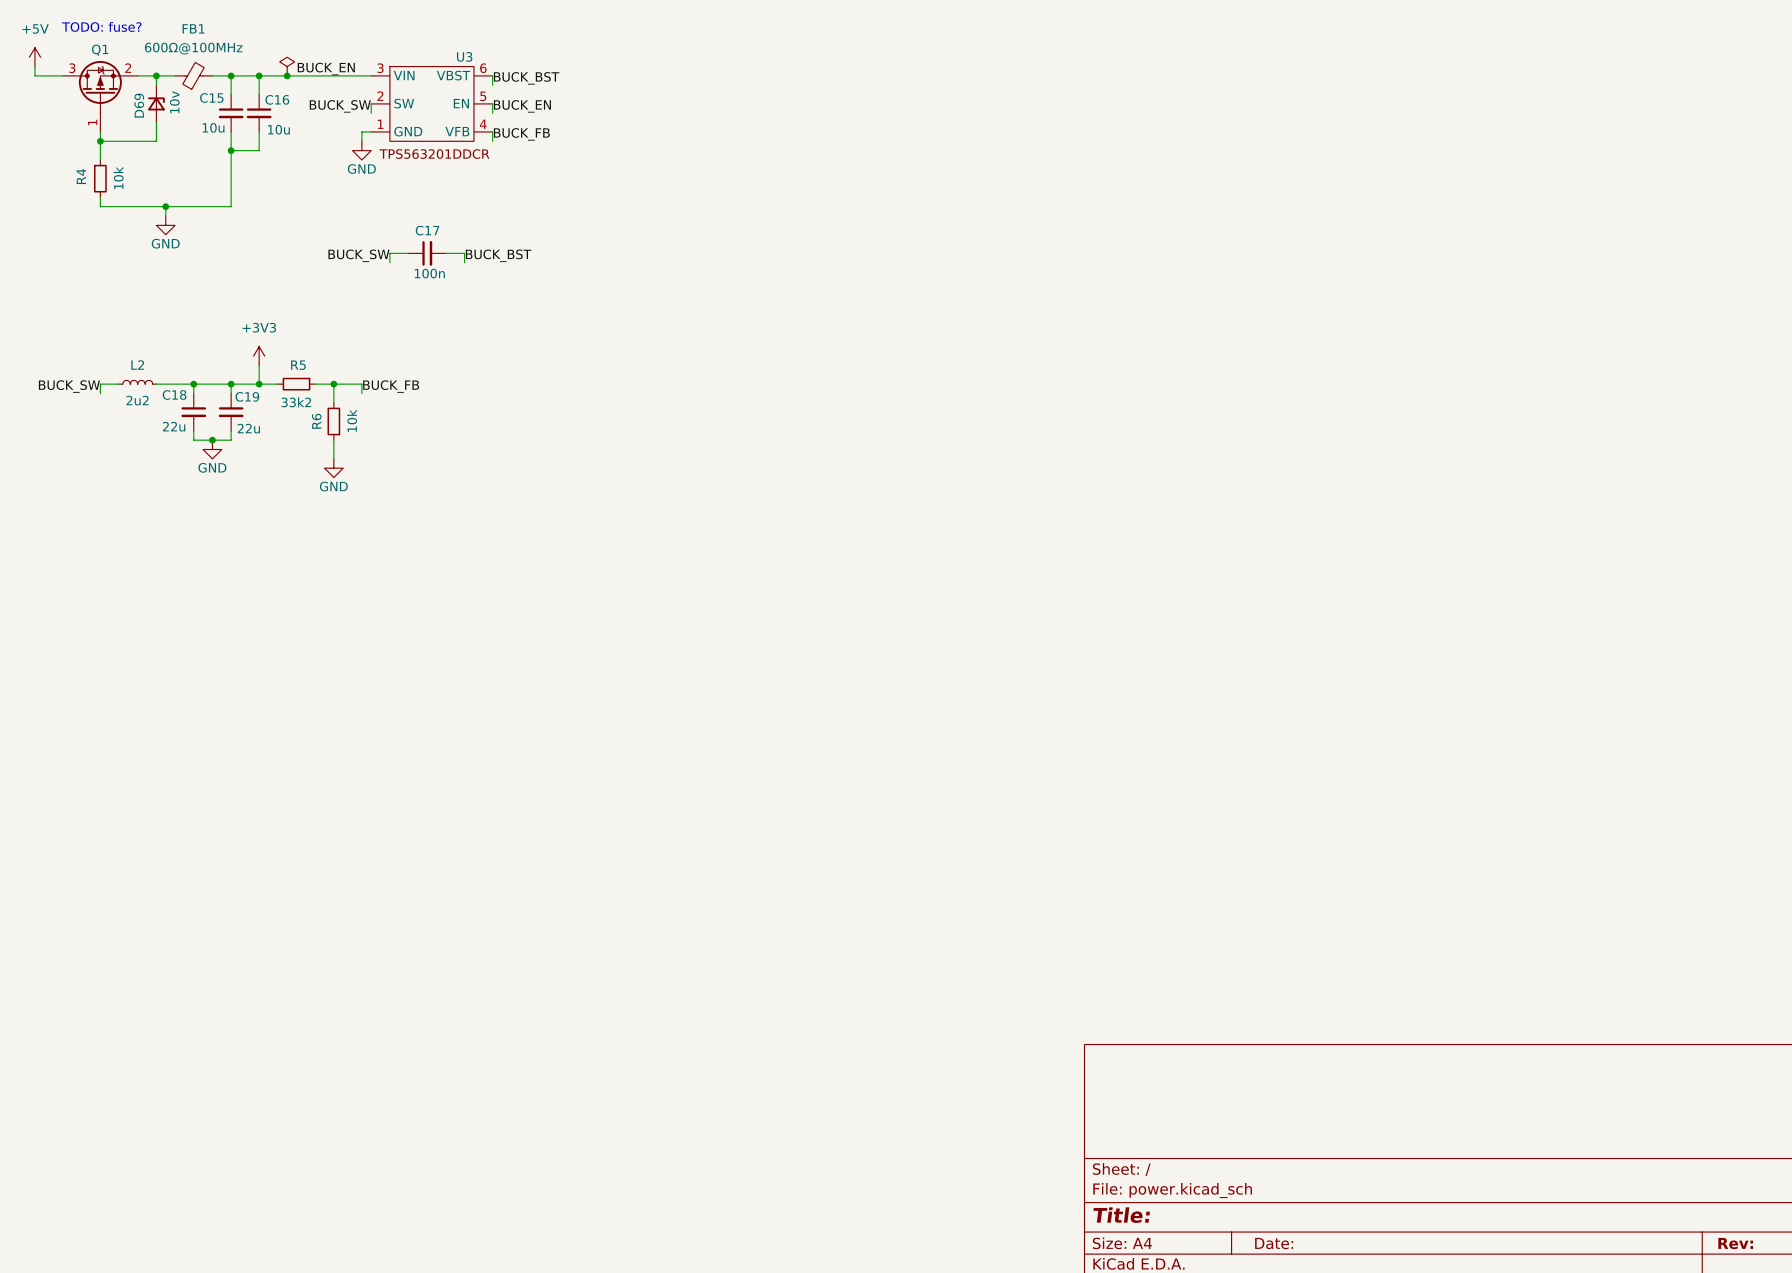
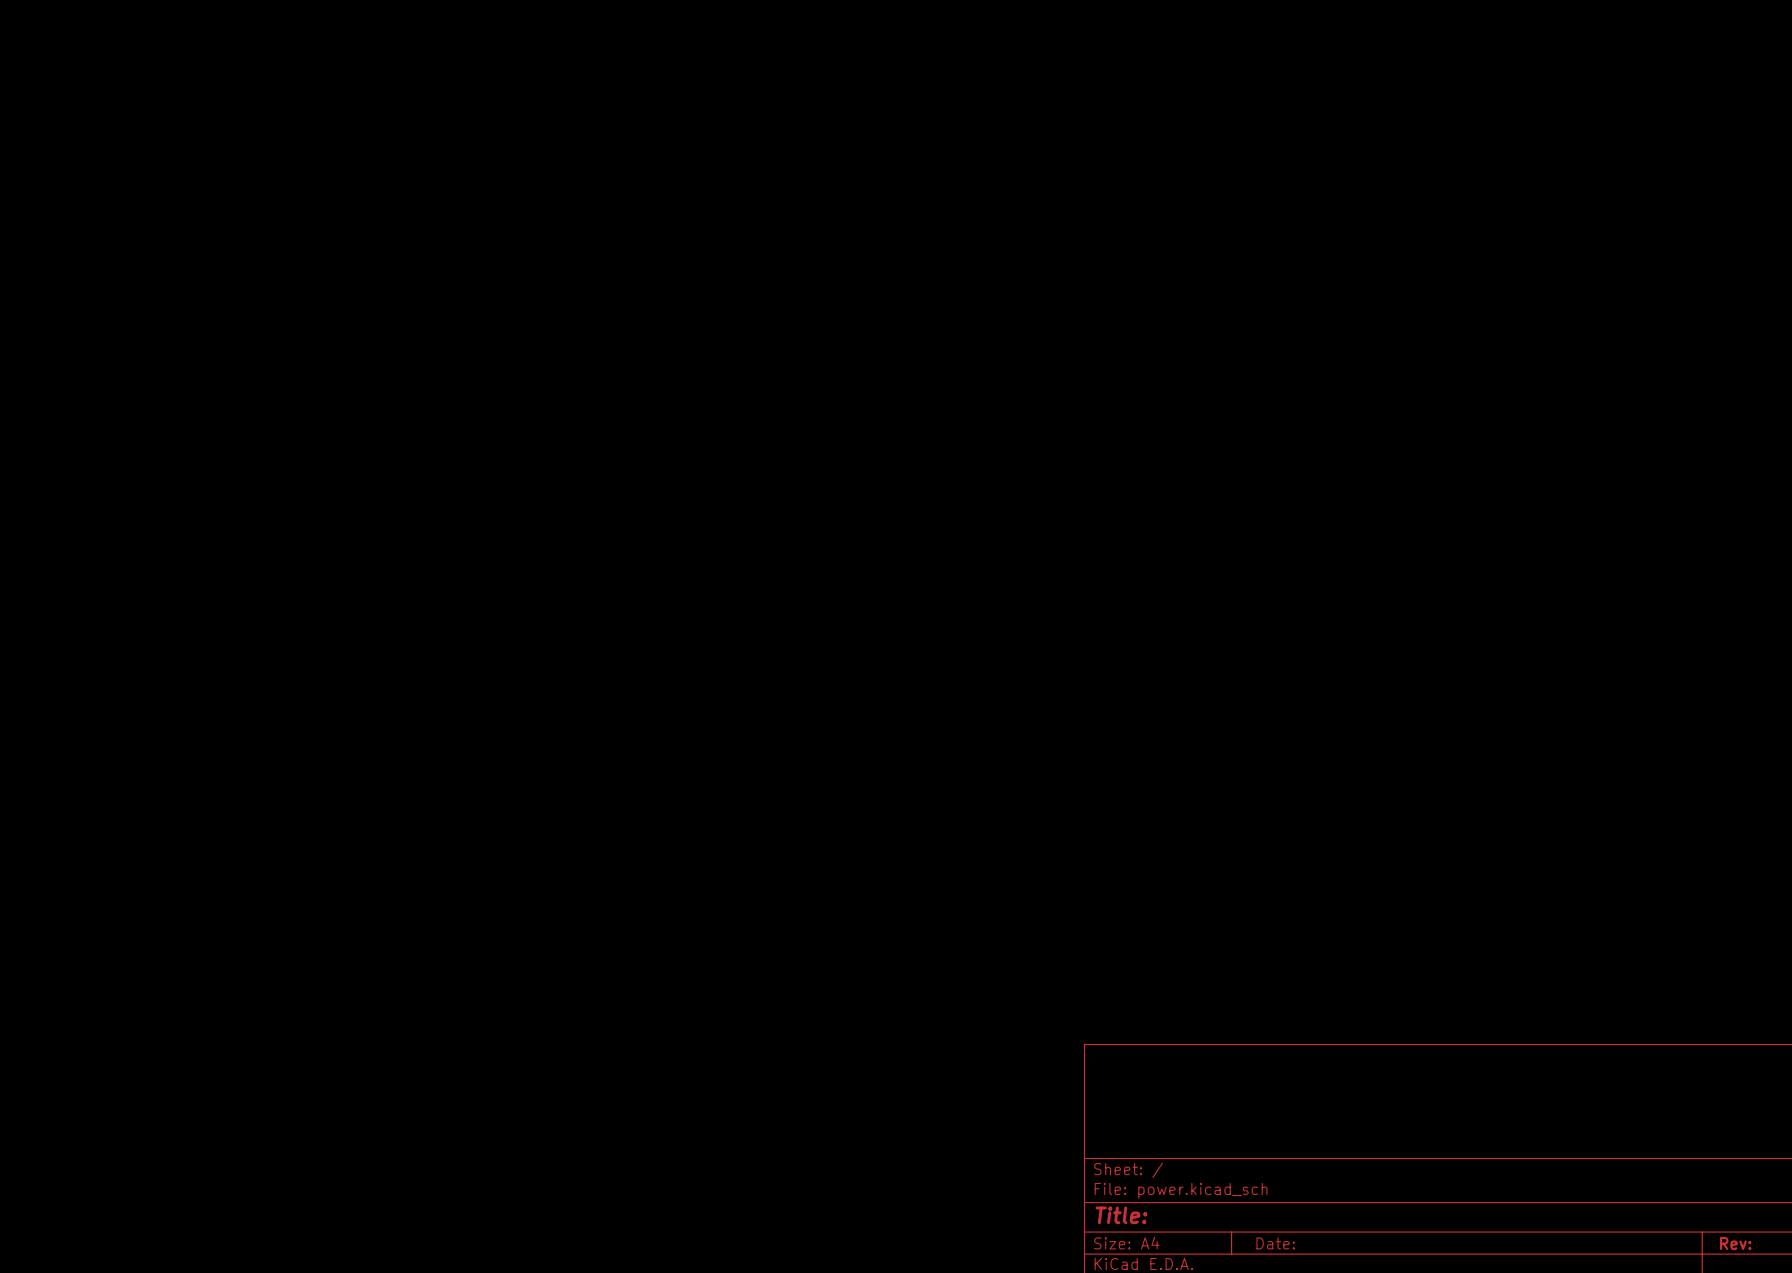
text: TODO: fuse? (101, 26) -> none
power symbol: +5V (34, 57) -> none
wire: (34, 66) (34, 75) (63, 75) -> none
power symbol: (287, 66) -> none
label: BUCK_EN (326, 69) -> none
wire: (137, 75) (175, 75) -> none
wire: (156, 75) (156, 85) -> none
junction: (156, 75) -> none
FB1: 600Ω@100MHz (193, 75) -> none
wire: (212, 75) (371, 75) -> none
wire: (231, 75) (231, 94) -> none
junction: (231, 75) -> none
wire: (259, 75) (259, 94) -> none
junction: (259, 75) -> none
junction: (287, 75) -> none
wire: (492, 75) (492, 85) -> none
label: BUCK_BST (526, 78) -> none
Q1: (100, 96) -> none
D69: 10v (156, 103) -> none
wire: (371, 103) (371, 113) -> none
U3: (431, 103) -> none
wire: (492, 103) (492, 113) -> none
label: BUCK_SW (340, 106) -> none
label: BUCK_EN (522, 106) -> none
C15: 10u (231, 113) -> none
C16: 10u (259, 113) -> none
wire: (156, 122) (156, 141) (100, 141) -> none
wire: (100, 131) (100, 159) -> none
wire: (231, 131) (231, 206) (100, 206) (100, 197) -> none
wire: (259, 131) (259, 150) (231, 150) -> none
wire: (371, 131) (361, 131) (361, 141) -> none
wire: (492, 131) (492, 141) -> none
label: BUCK_FB (521, 134) -> none
junction: (100, 141) -> none
junction: (231, 150) -> none
power symbol: GND (361, 150) -> none
R4: 10k (100, 178) -> none
wire: (165, 206) (165, 216) -> none
junction: (165, 206) -> none
power symbol: GND (165, 225) -> none
wire: (408, 253) (389, 253) (389, 262) -> none
C17: 100n (427, 253) -> none
wire: (445, 253) (464, 253) (464, 262) -> none
label: BUCK_SW (358, 255) -> none
label: BUCK_BST (498, 255) -> none
power symbol: +3V3 (259, 356) -> none
wire: (259, 365) (259, 384) -> none
L2: 2u2 (137, 382) -> none
wire: (119, 384) (100, 384) (100, 393) -> none
wire: (156, 384) (277, 384) -> none
wire: (193, 384) (193, 393) -> none
junction: (193, 384) -> none
wire: (231, 384) (231, 393) -> none
junction: (231, 384) -> none
junction: (259, 384) -> none
R5: 33k2 (296, 384) -> none
wire: (315, 384) (361, 384) (361, 393) -> none
wire: (333, 384) (333, 402) -> none
junction: (333, 384) -> none
label: BUCK_SW (69, 386) -> none
label: BUCK_FB (391, 386) -> none
C18: 22u (193, 412) -> none
C19: 22u (231, 412) -> none
R6: 10k (333, 421) -> none
wire: (193, 430) (193, 440) (231, 440) (231, 430) -> none
junction: (212, 440) -> none
wire: (333, 440) (333, 458) -> none
power symbol: GND (212, 449) -> none
power symbol: GND (333, 468) -> none

